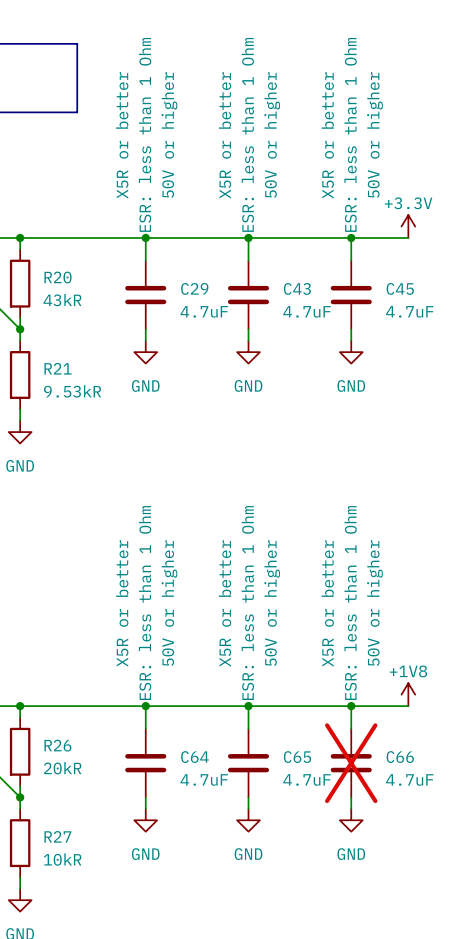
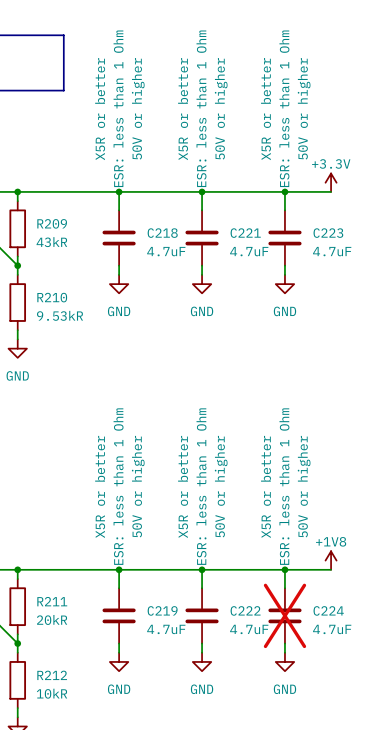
R20 name: R20 (57, 277) -> R209 (52, 223)
C29 name: C29 (194, 288) -> C218 (162, 233)
C43 name: C43 (297, 288) -> C221 (245, 233)
C45 name: C45 (400, 288) -> C223 (328, 233)
R21 name: R21 (58, 368) -> R210 (52, 297)
R26 name: R26 (57, 745) -> R211 (52, 601)
C64 name: C64 (194, 757) -> C219 (162, 610)
C65 name: C65 (297, 757) -> C222 (245, 610)
C66 name: C66 (400, 757) -> C224 (328, 610)
R27 name: R27 (57, 836) -> R212 (52, 675)

